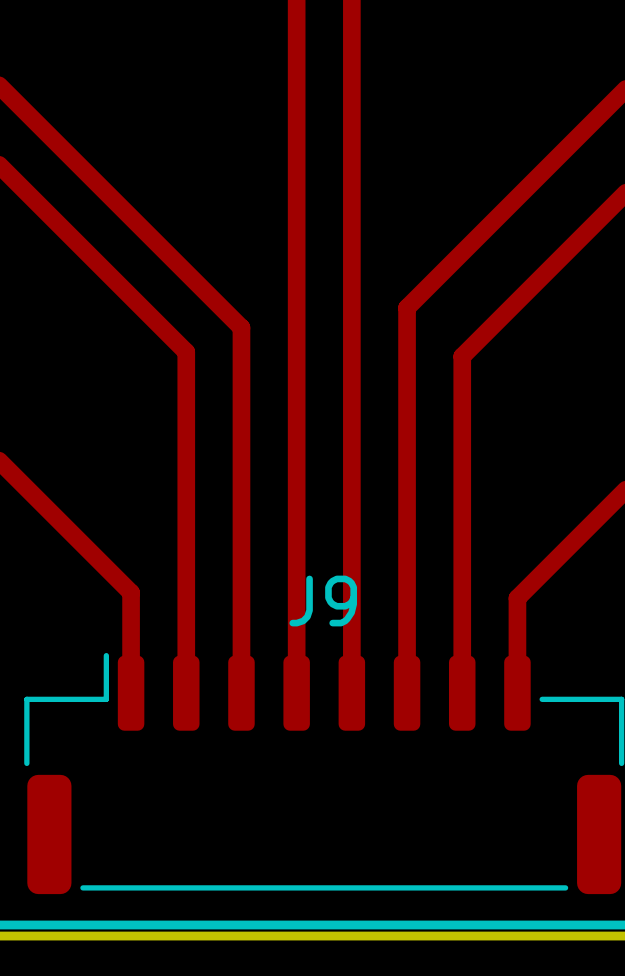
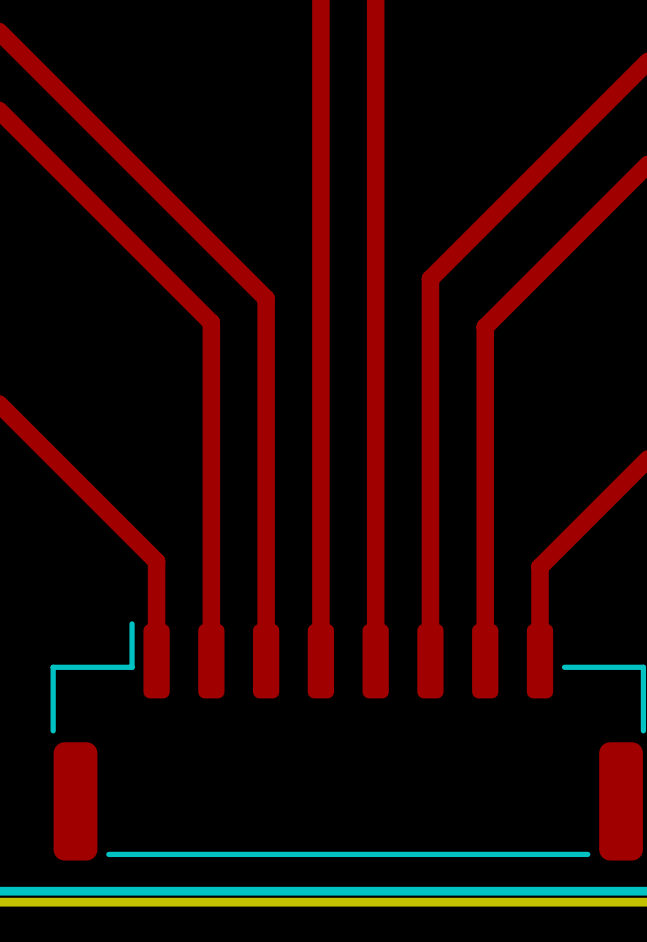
J9 name: J9 (323, 601) -> none

